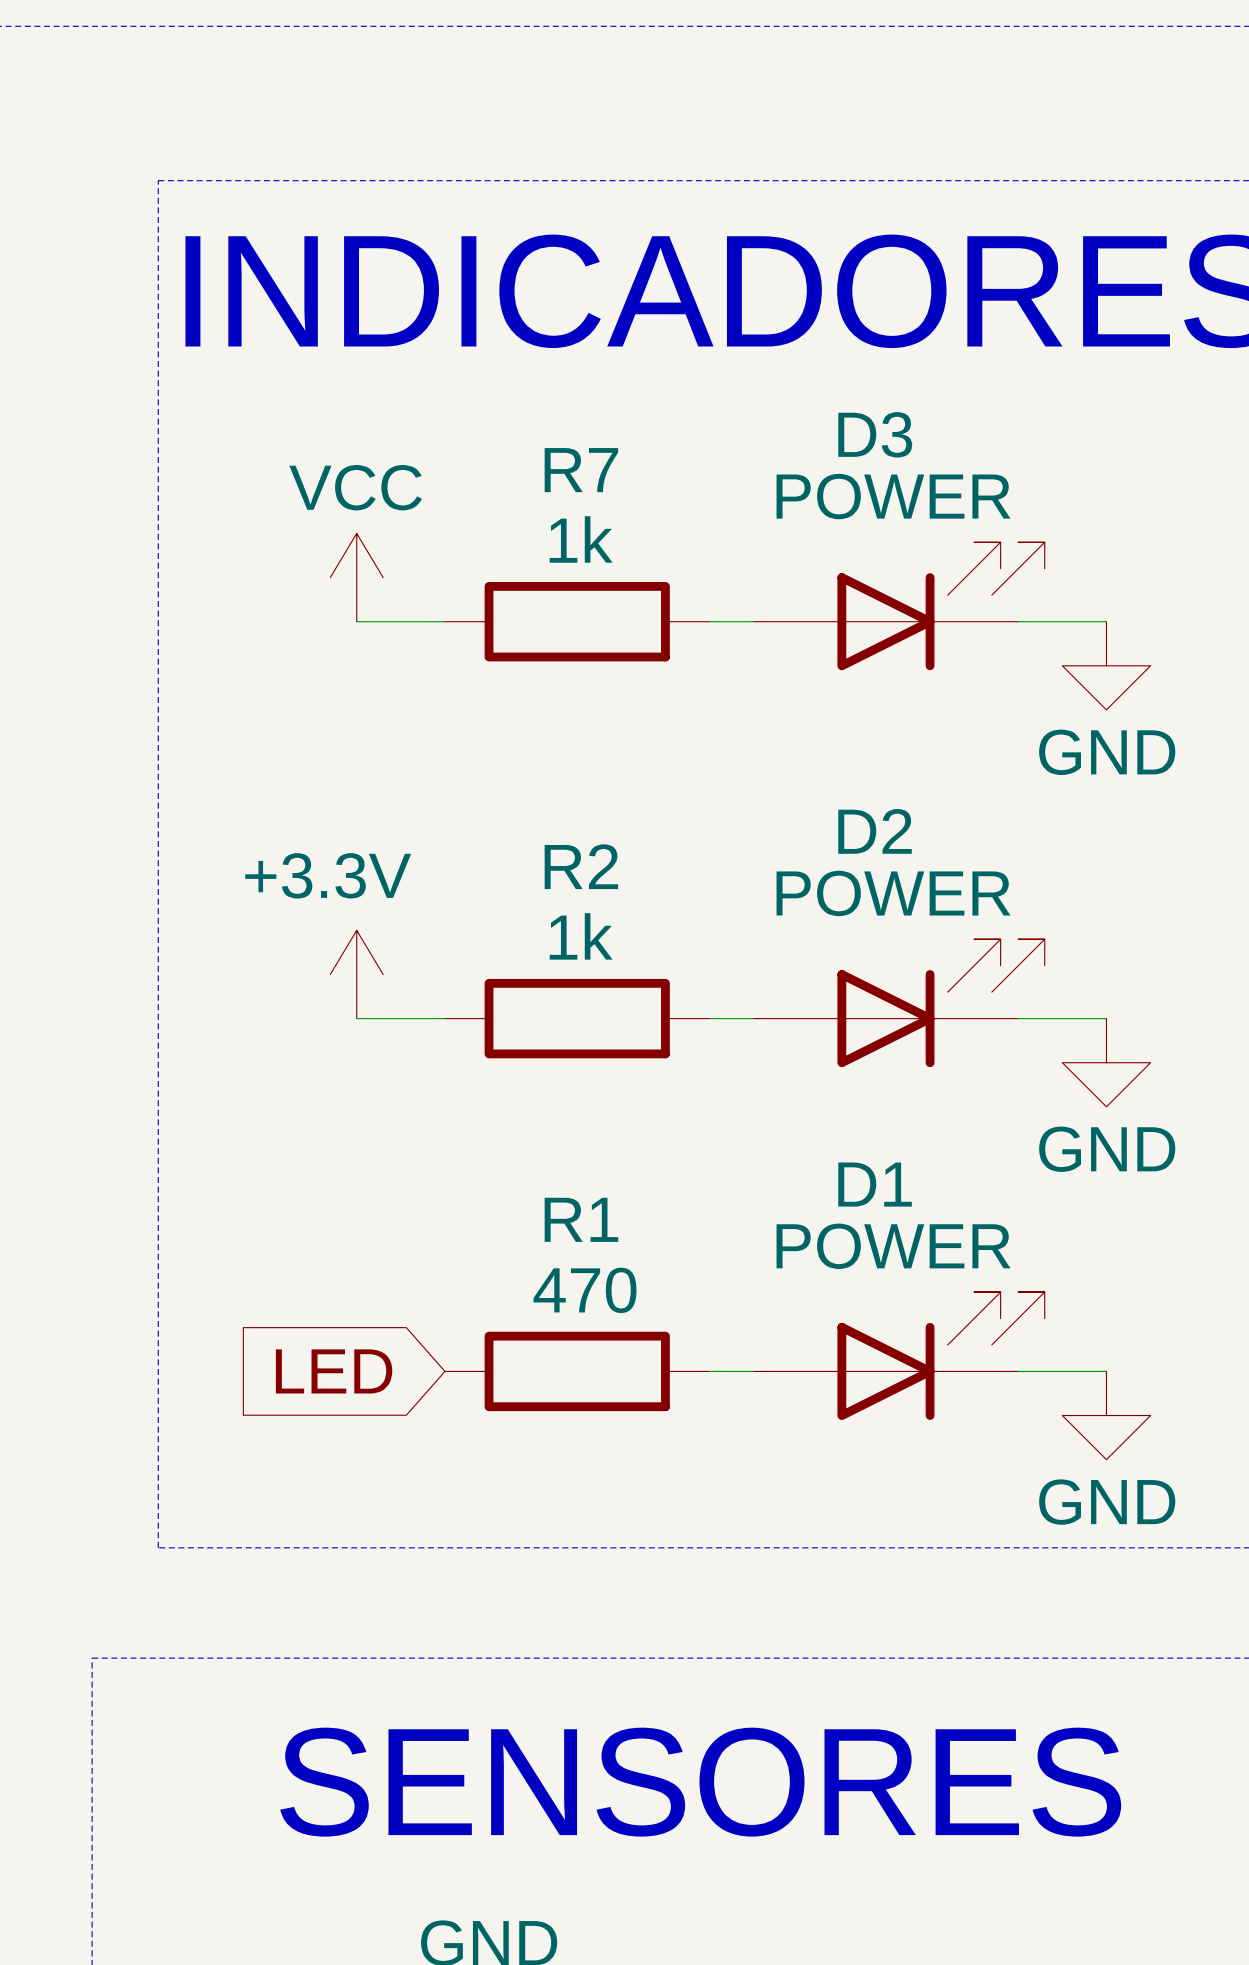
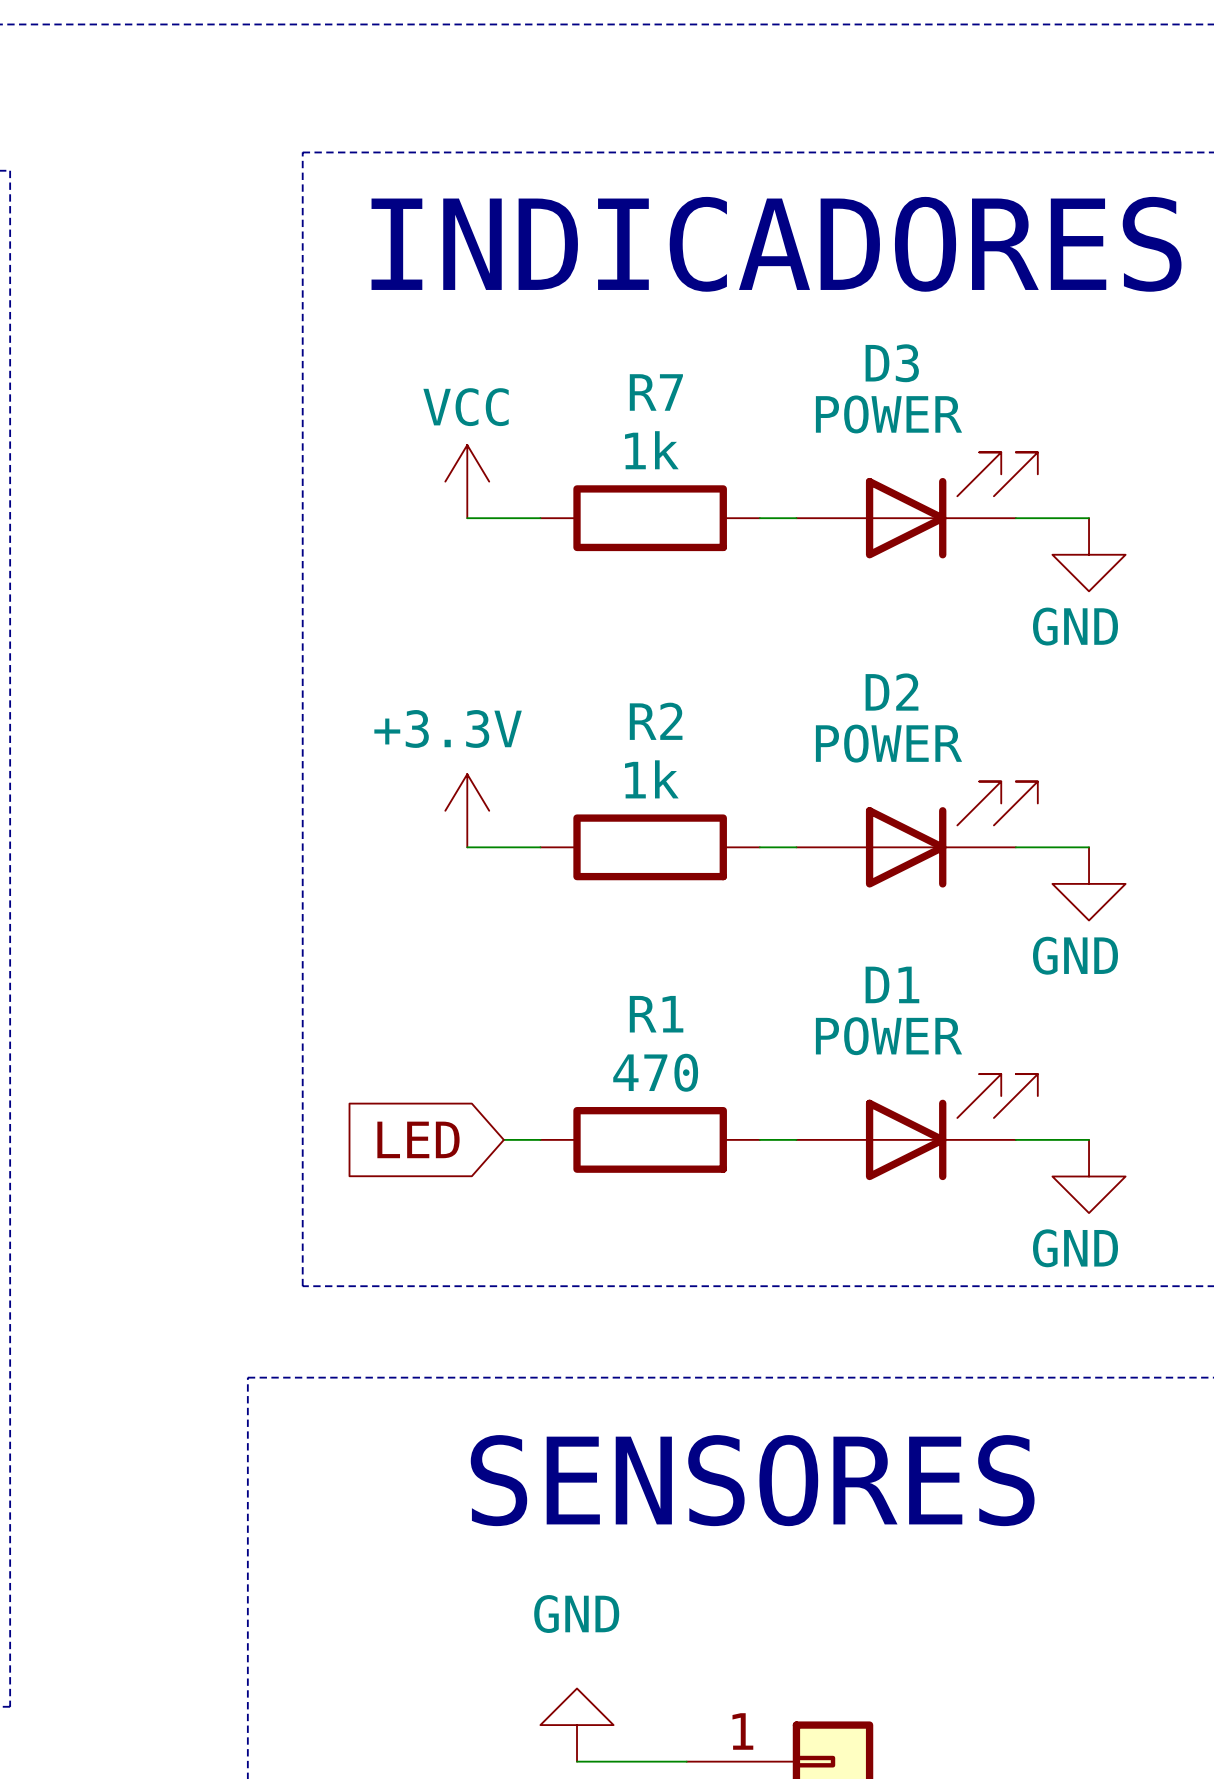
global label position: LED (334, 1371) -> LED (418, 1139)
wire: none -> (503, 1139) (540, 1139)

